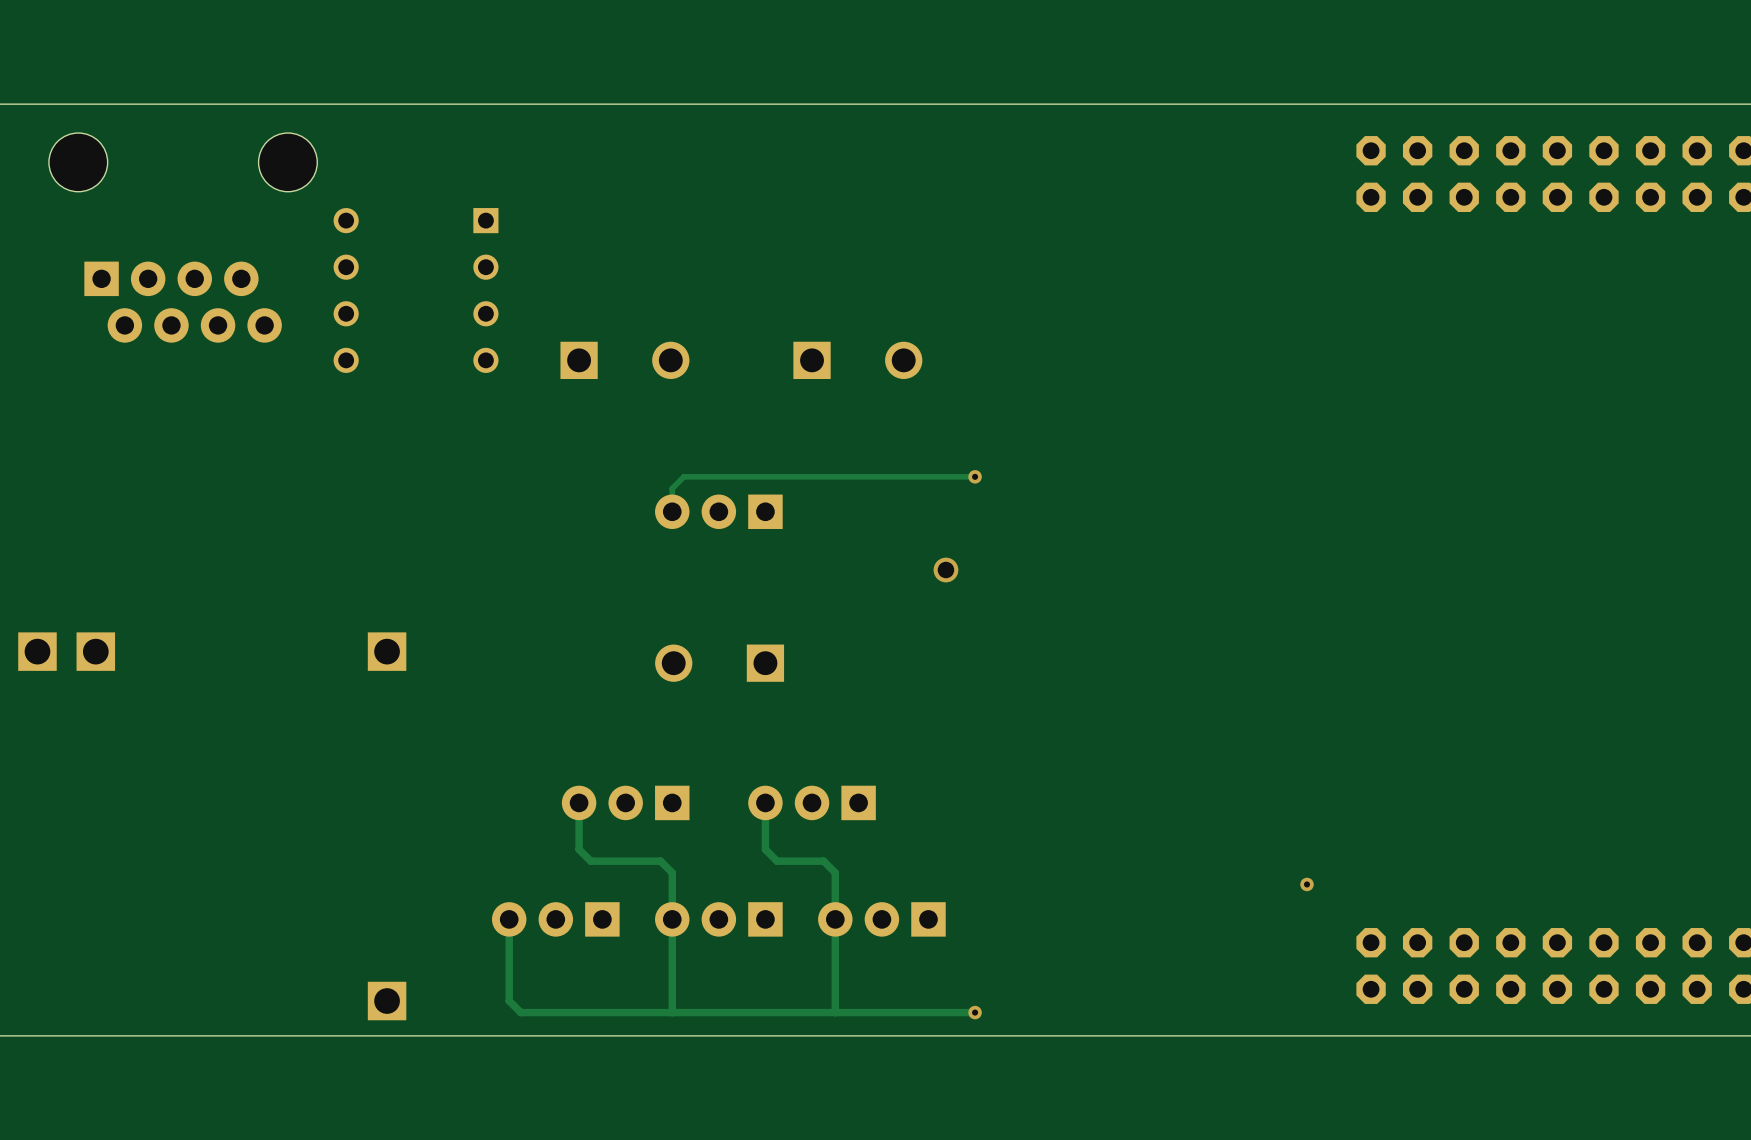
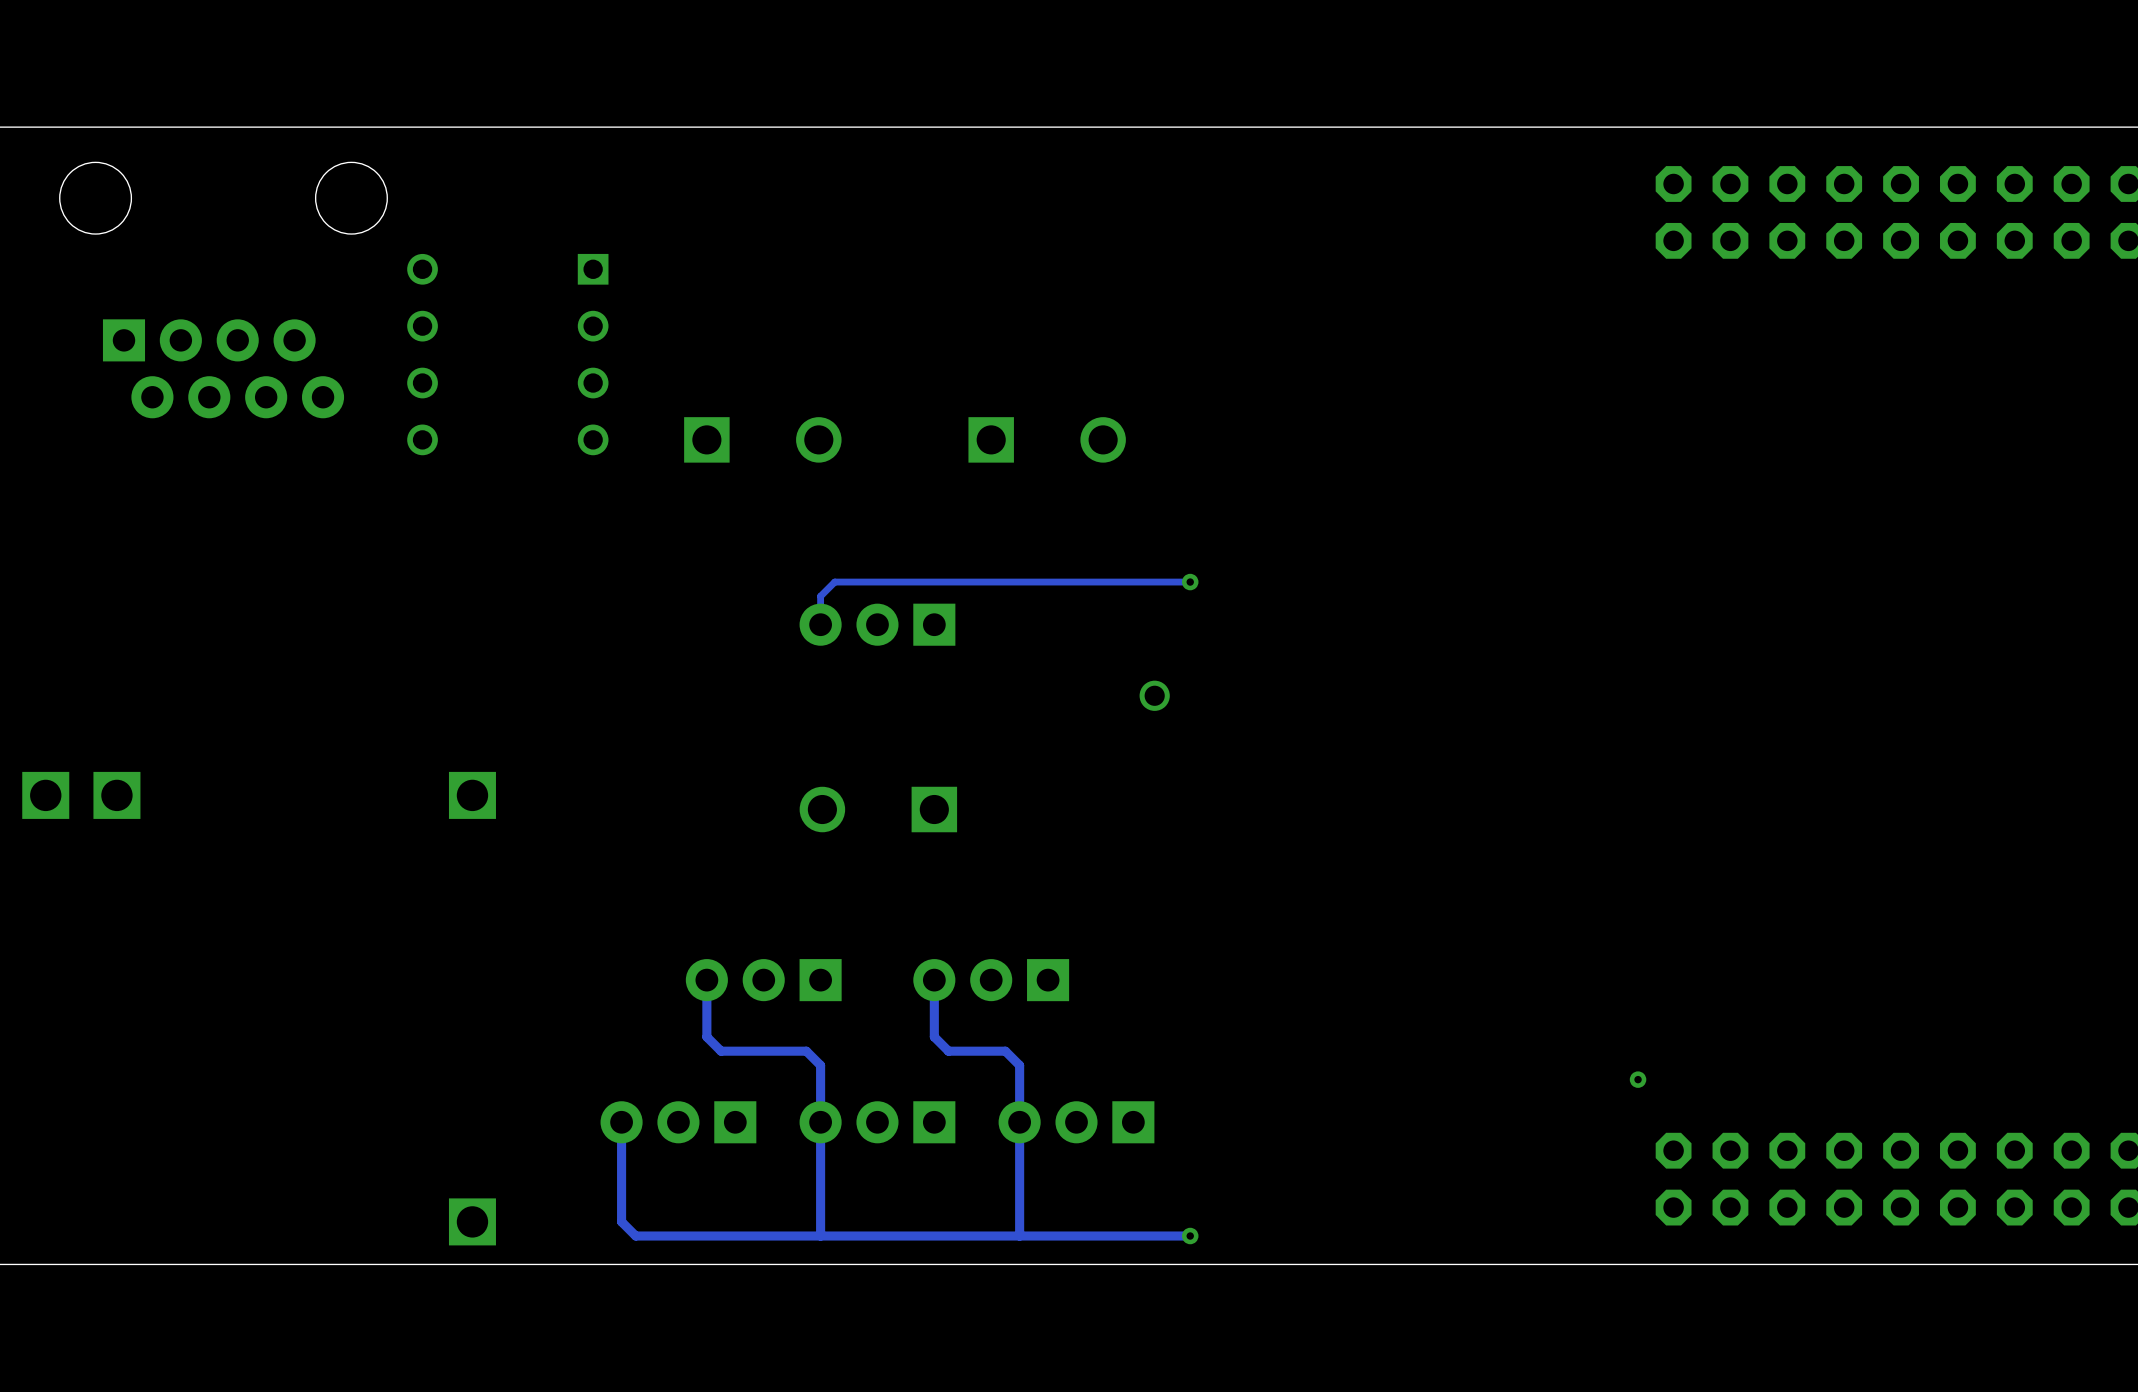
via position: (1307, 884) -> (1638, 1079)

